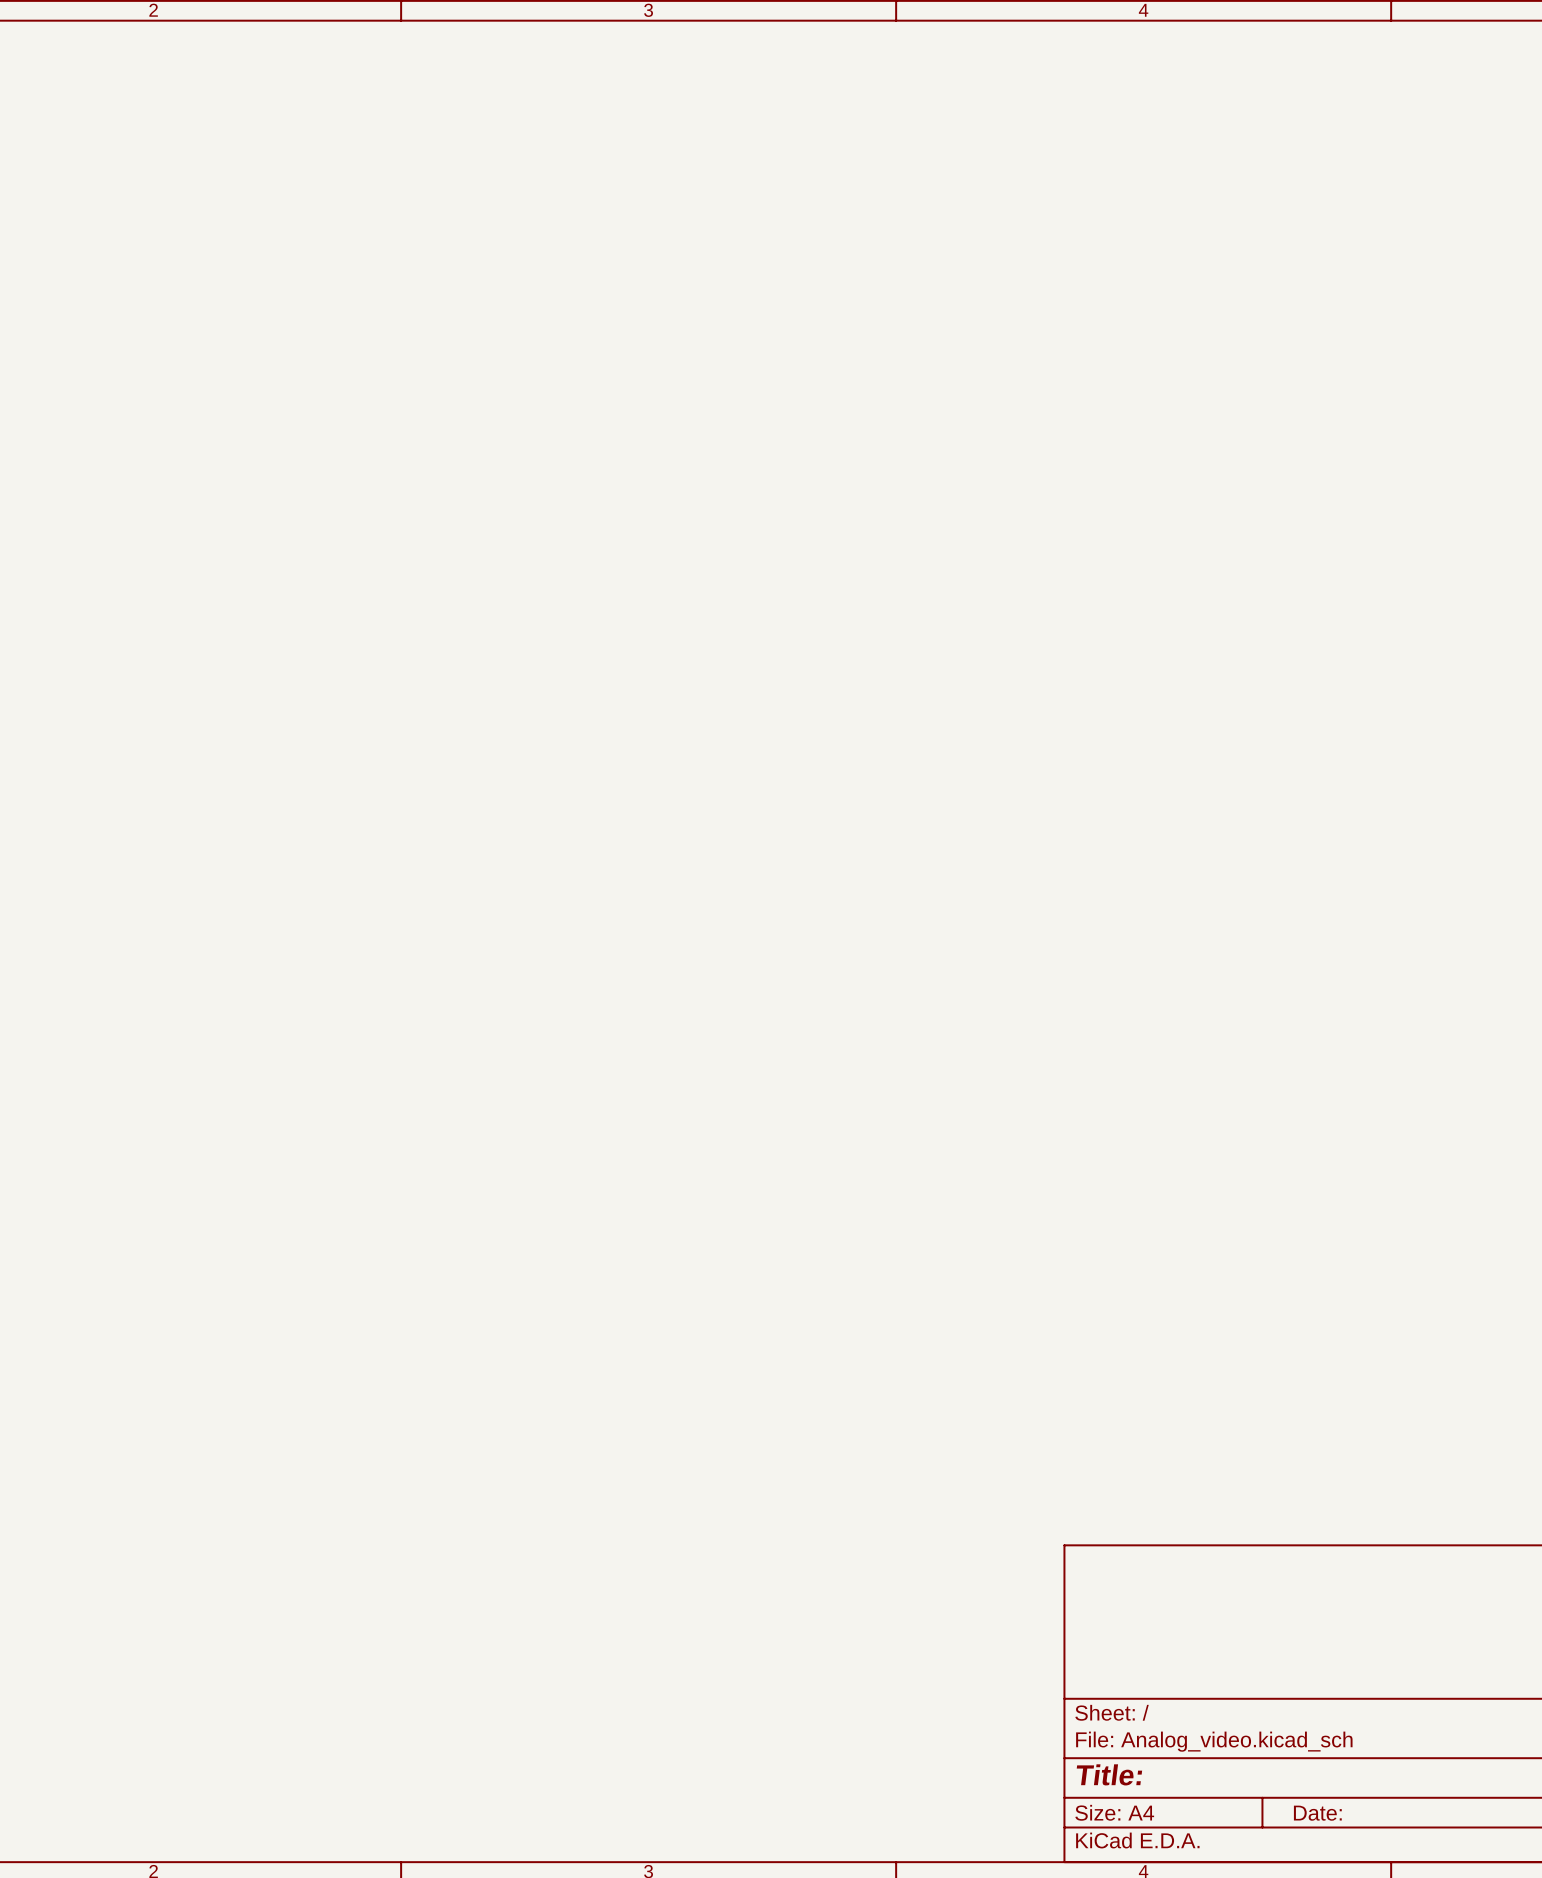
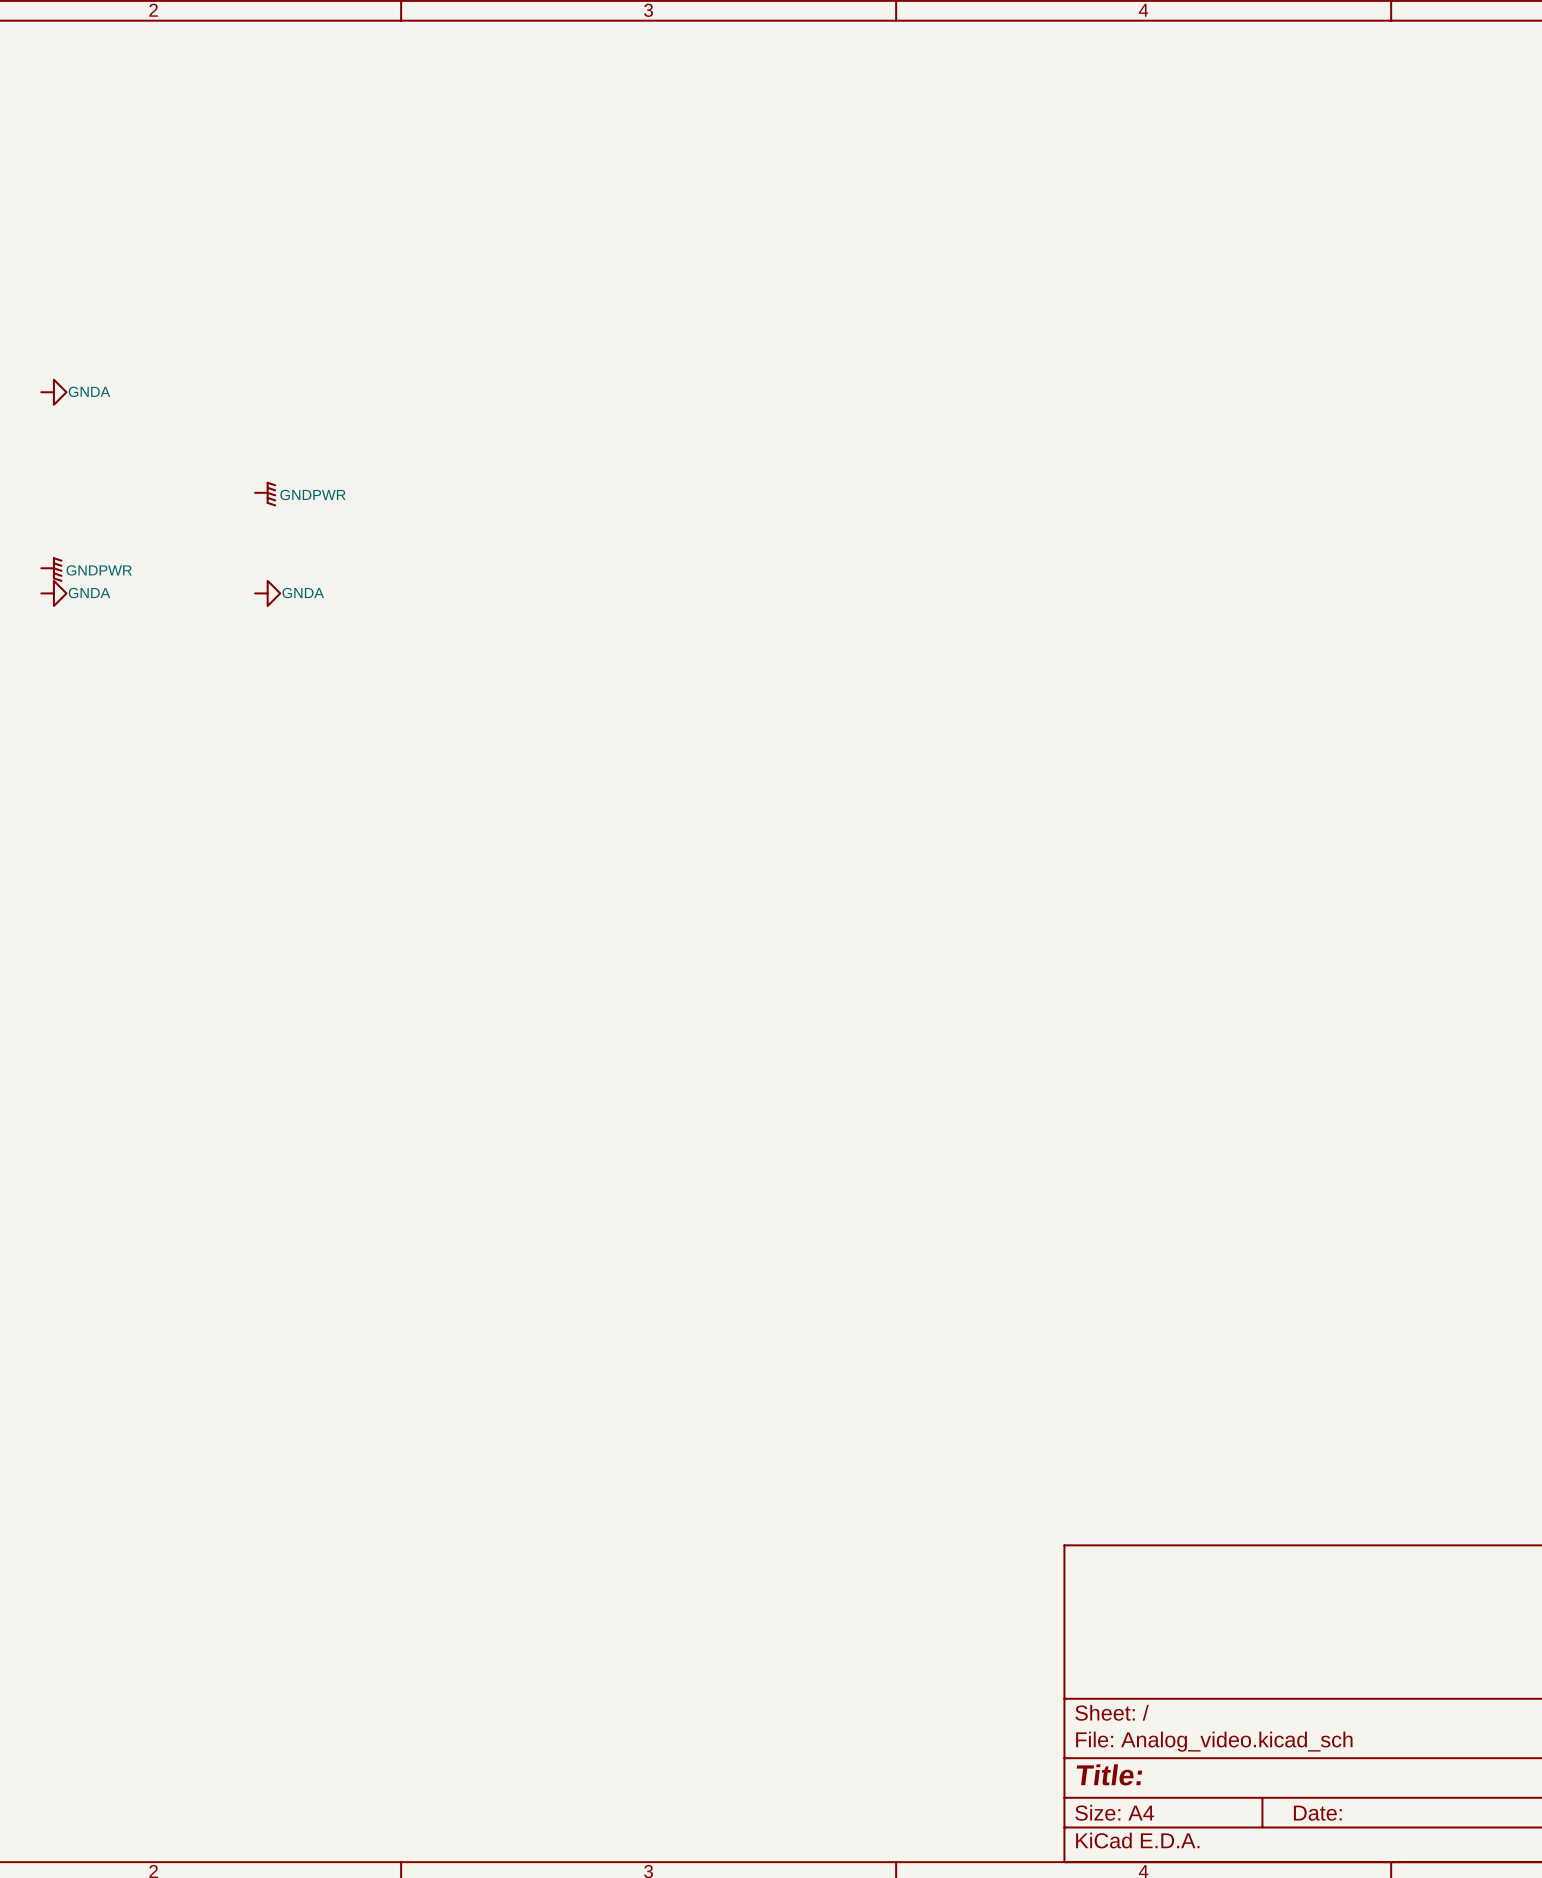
power symbol: none -> GNDA (53, 392)
power symbol: none -> GNDPWR (265, 494)
power symbol: none -> GNDPWR (51, 569)
power symbol: none -> GNDA (53, 593)
power symbol: none -> GNDA (267, 593)

